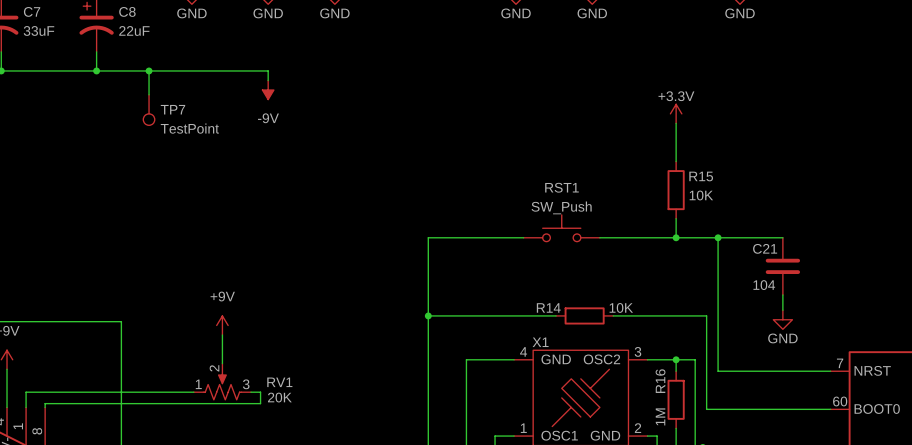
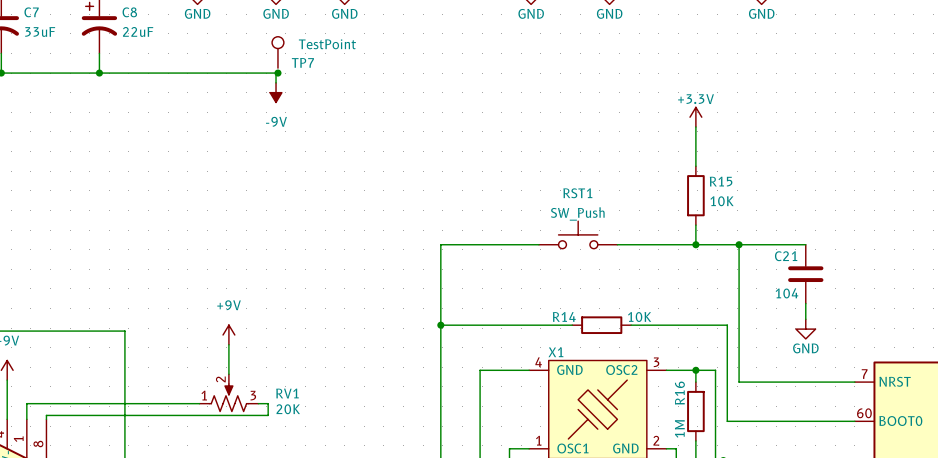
wire: (149, 70) (149, 94) -> none
junction: (149, 70) -> none
junction: none -> (277, 73)
TP7 position: (149, 110) -> (277, 52)
TP7 rotation: 0° (149, 119) -> 180° (277, 42)
TP7 value position: TestPoint (189, 128) -> TestPoint (327, 44)

